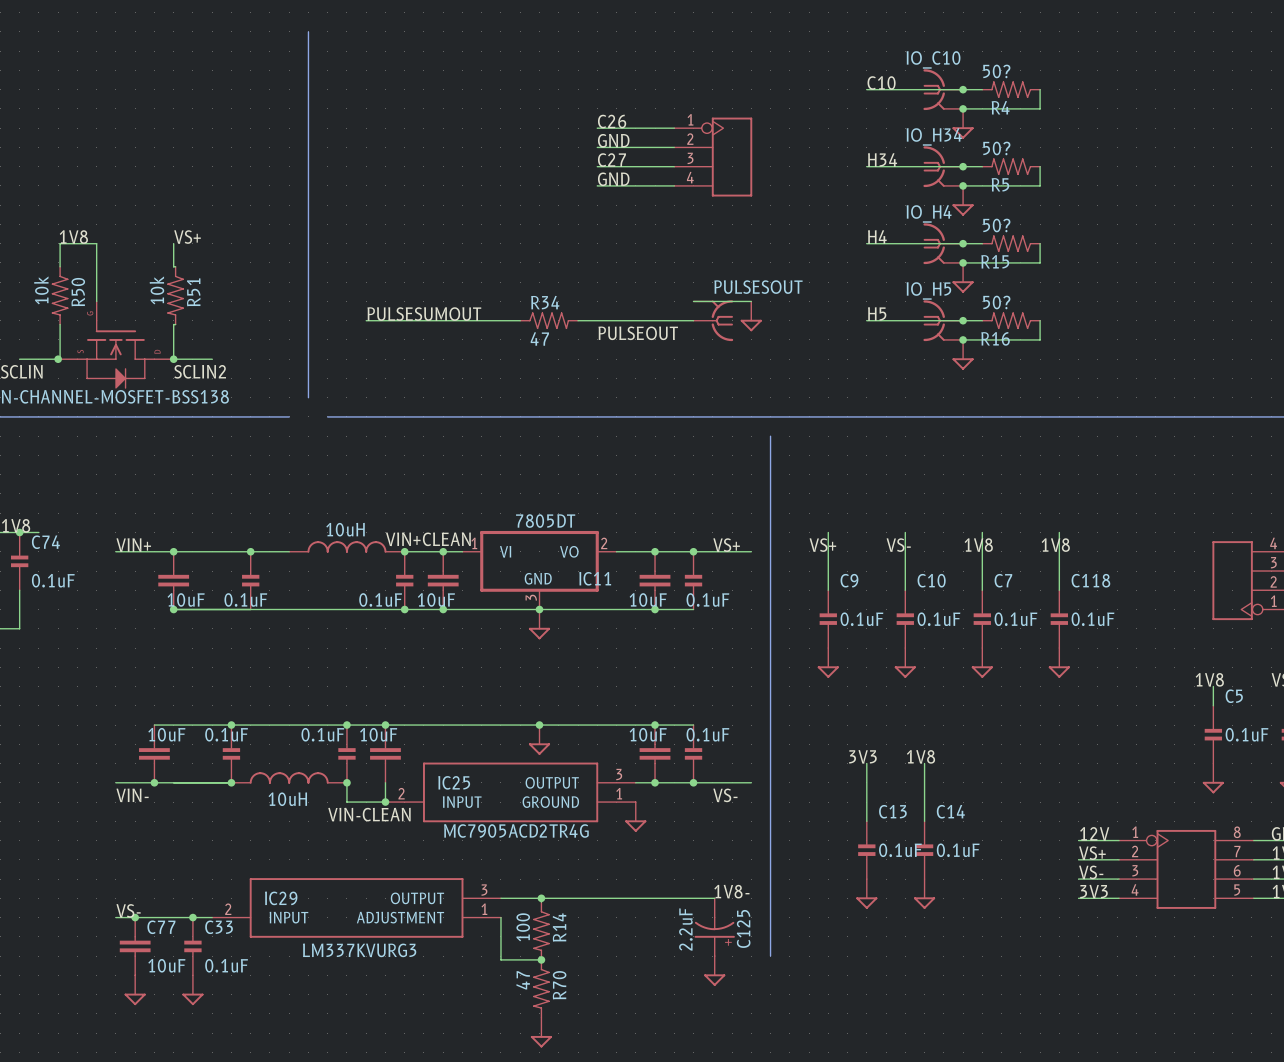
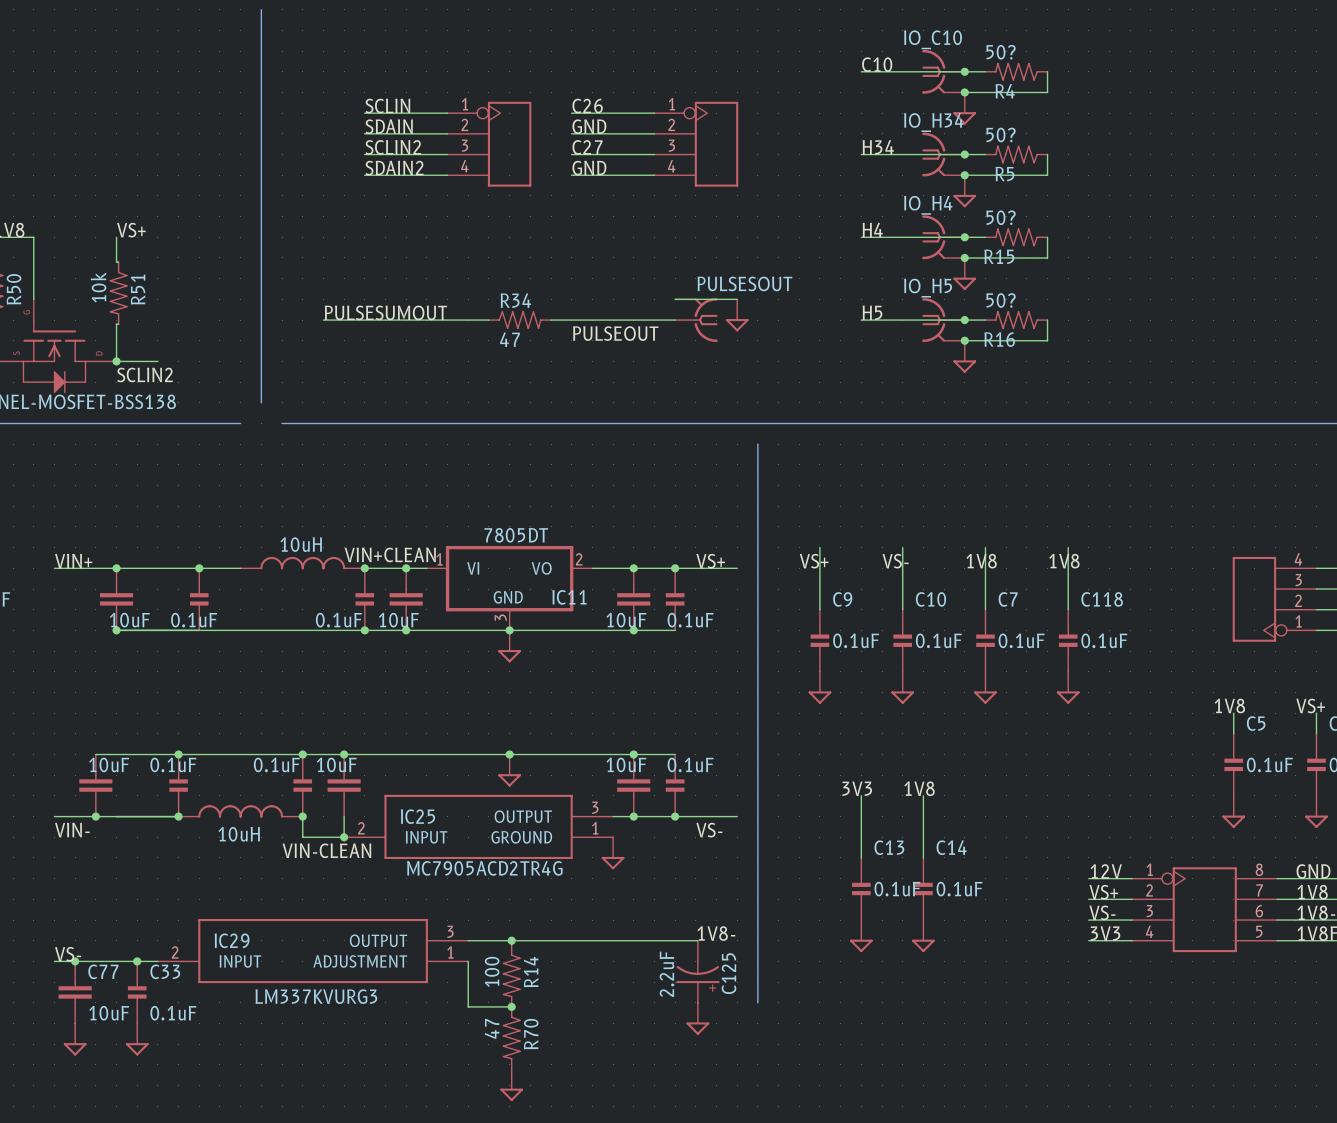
label: none -> SCLIN (387, 106)
wire: none -> (364, 113) (447, 113)
label: none -> SDAIN (389, 126)
wire: none -> (364, 133) (447, 133)
part: none -> (489, 144)
label: none -> SCLIN2 (393, 147)
wire: none -> (364, 154) (447, 154)
label: none -> SDAIN2 (394, 168)
wire: none -> (364, 175) (447, 175)

